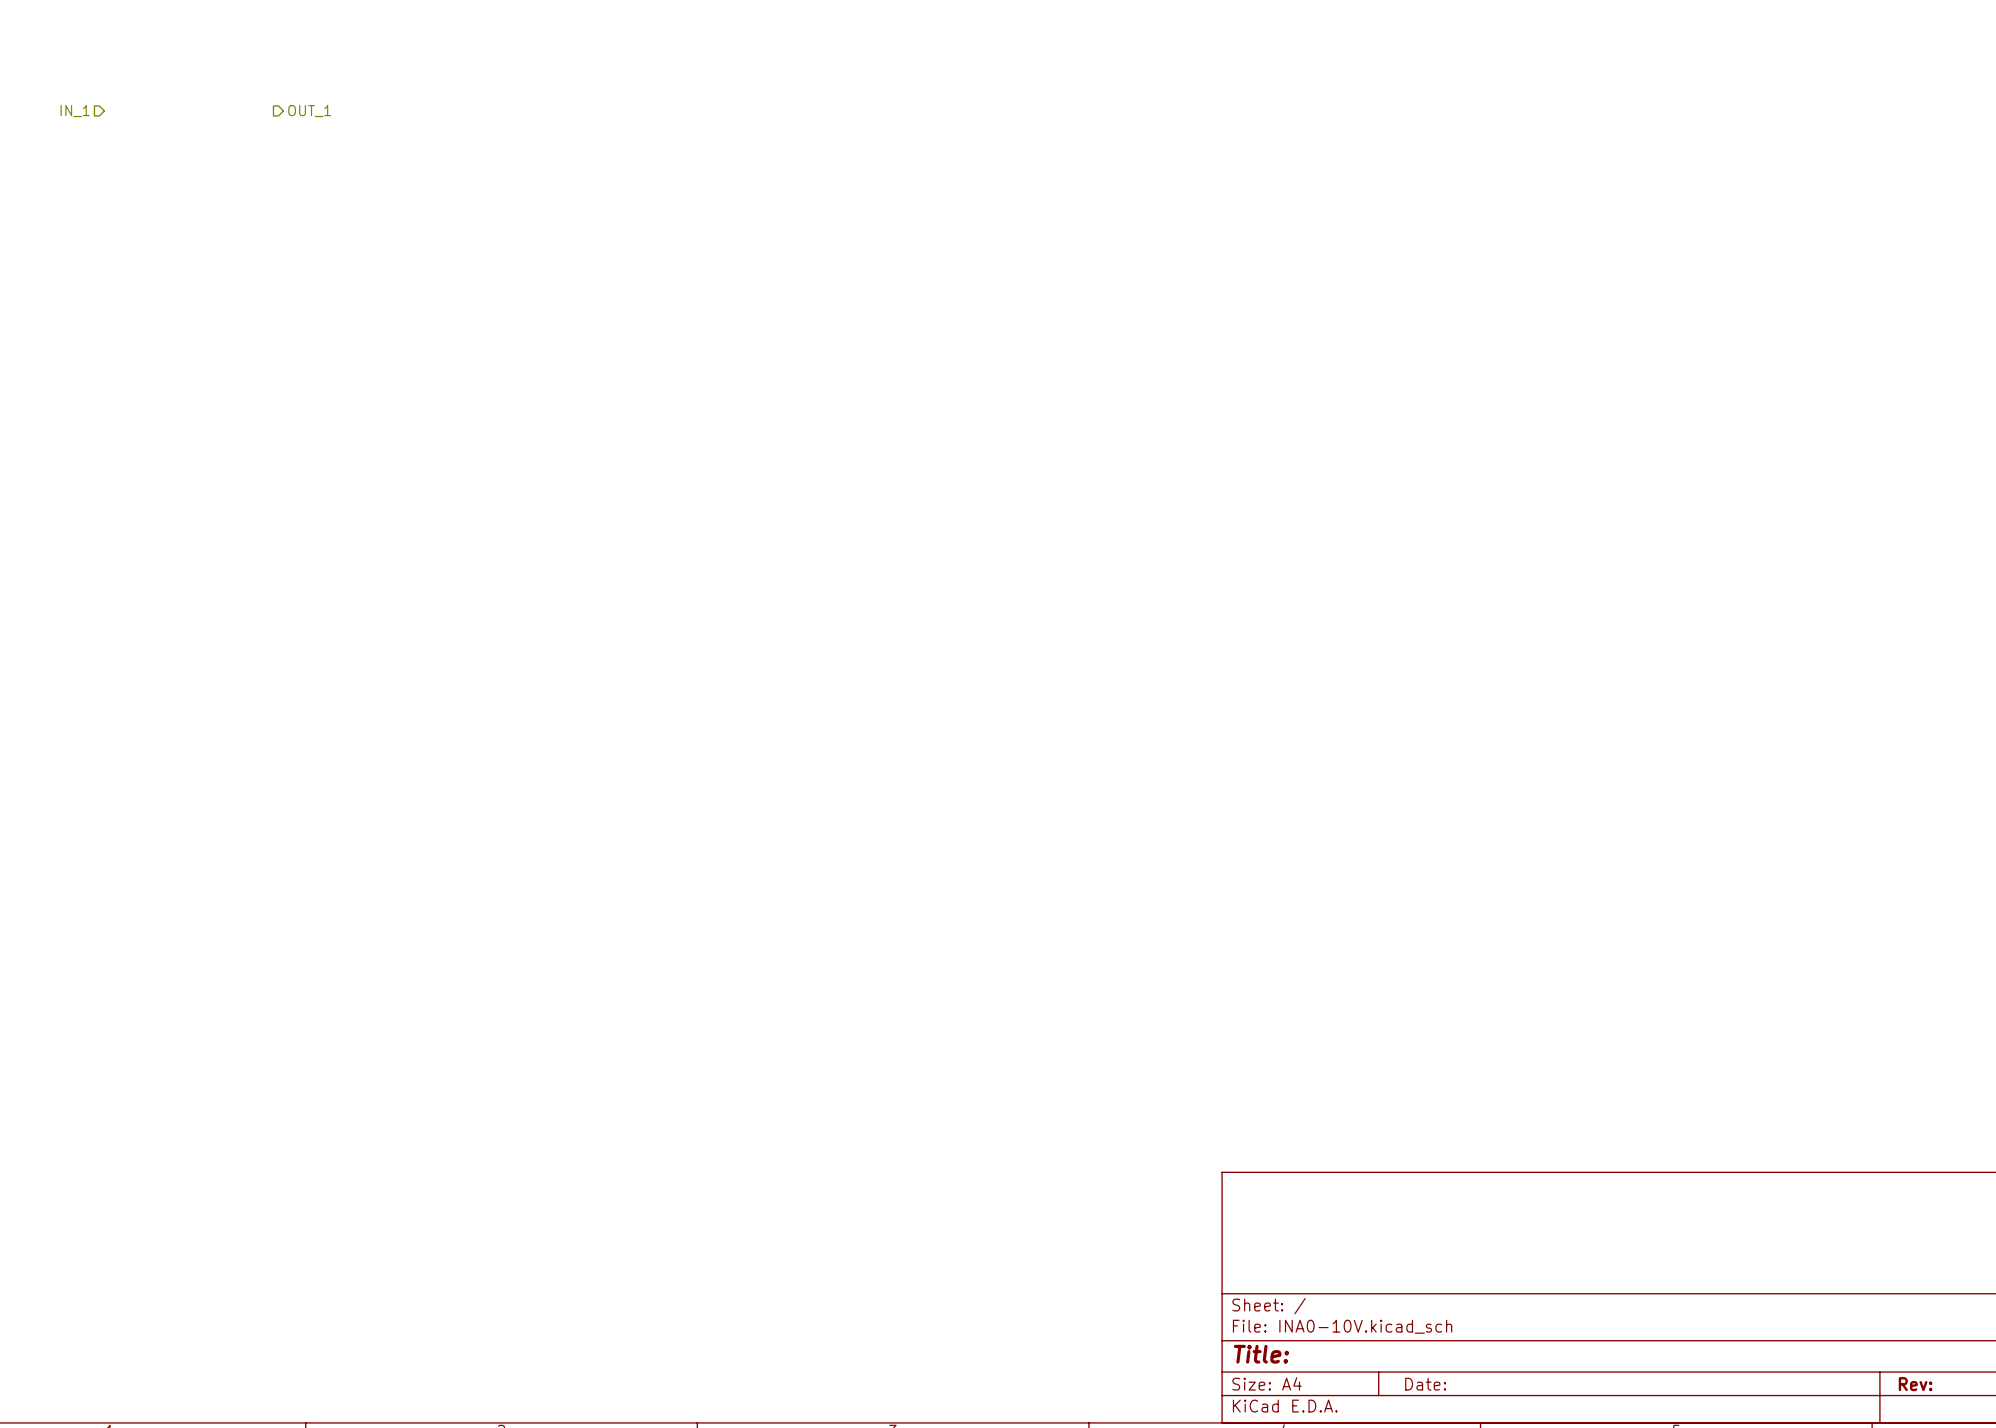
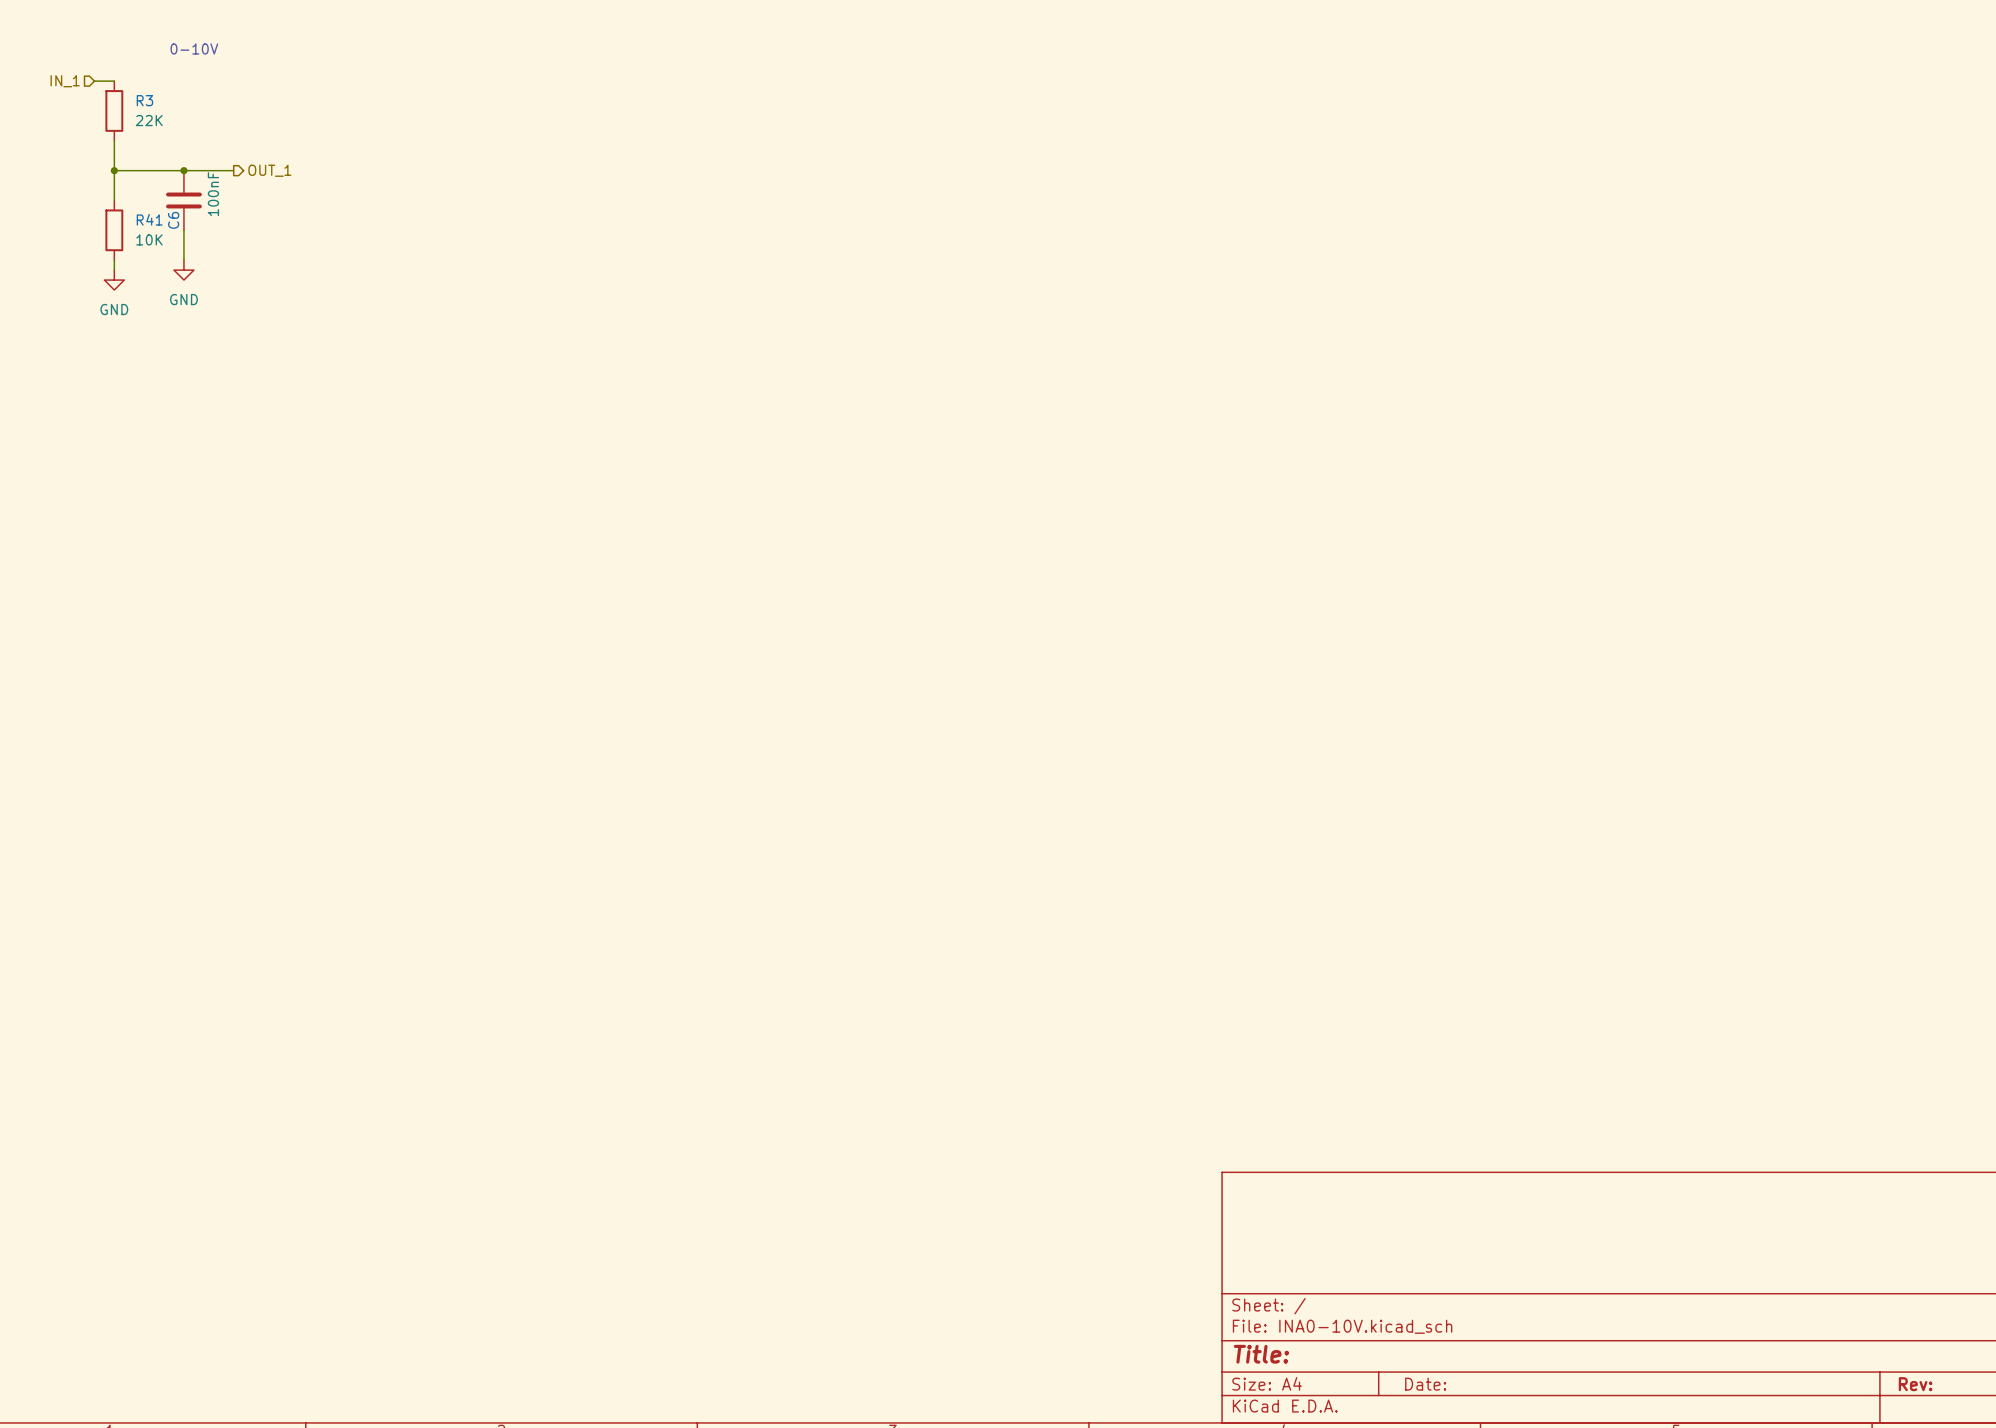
text: none -> 0-10V (194, 48)
wire: none -> (94, 81) (114, 81)
R3: none -> 22K (114, 110)
hierarchical label position: IN_1 (75, 111) -> IN_1 (65, 81)
hierarchical label position: OUT_1 (309, 111) -> OUT_1 (269, 170)
wire: none -> (114, 140) (114, 200)
wire: none -> (114, 170) (233, 170)
junction: none -> (114, 170)
junction: none -> (183, 170)
C6: none -> 100nF (183, 200)
R41: none -> 10K (114, 230)
wire: none -> (183, 230) (183, 260)
wire: none -> (114, 260) (114, 270)
power symbol: none -> GND (183, 270)
power symbol: none -> GND (114, 280)

